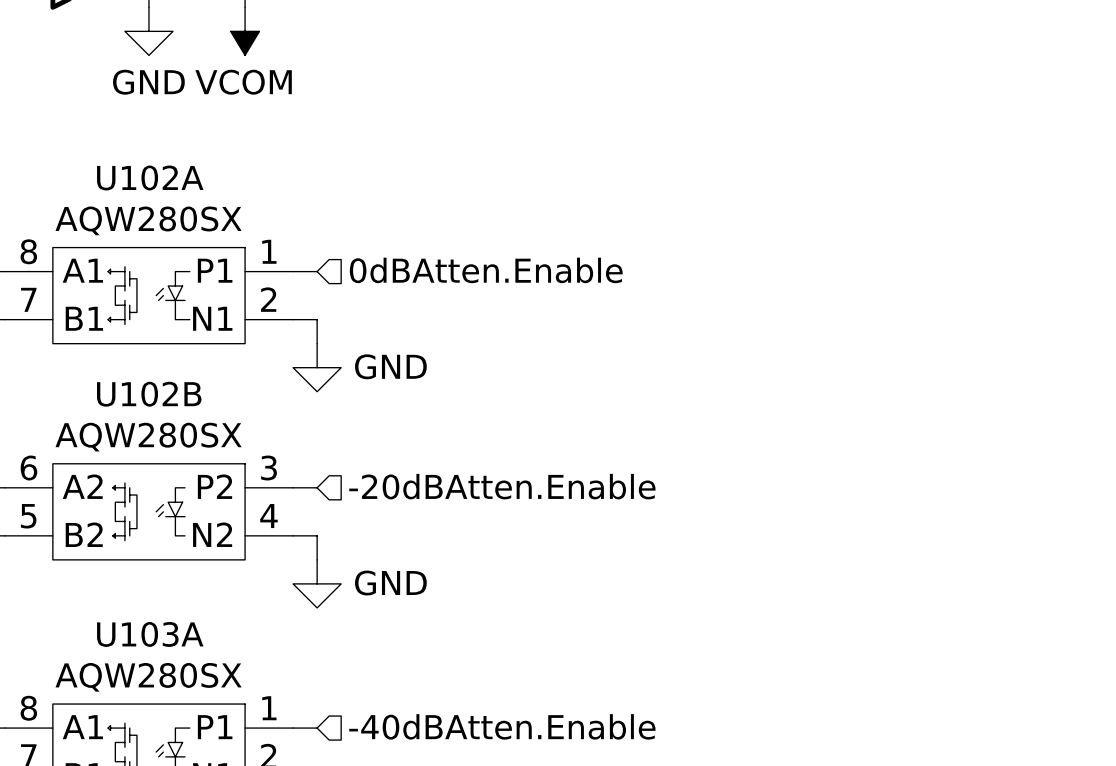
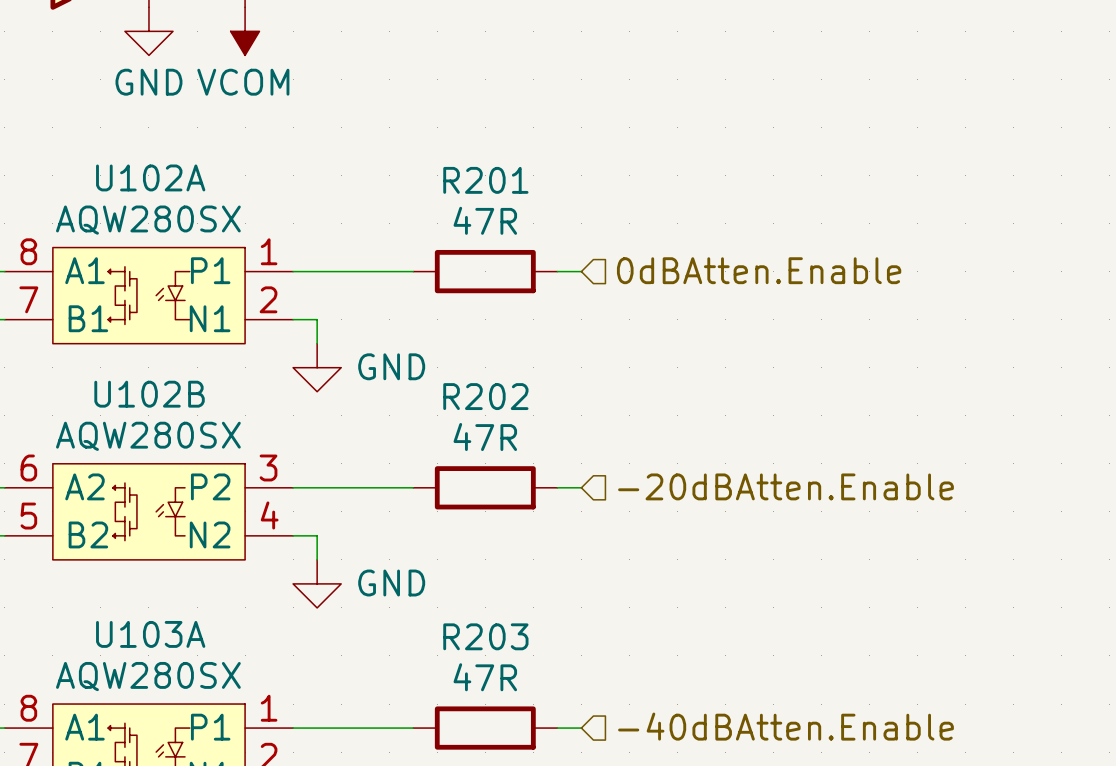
hierarchical label position: 0dBAtten.Enable (486, 270) -> 0dBAtten.Enable (759, 270)
wire: none -> (317, 271) (413, 271)
R201: none -> 47R (485, 271)
wire: none -> (557, 271) (581, 271)
hierarchical label position: -20dBAtten.Enable (502, 486) -> -20dBAtten.Enable (785, 486)
wire: none -> (317, 487) (413, 487)
R202: none -> 47R (485, 487)
wire: none -> (557, 487) (581, 487)
hierarchical label position: -40dBAtten.Enable (502, 726) -> -40dBAtten.Enable (785, 726)
wire: none -> (317, 728) (413, 728)
R203: none -> 47R (485, 728)
wire: none -> (557, 728) (581, 728)

